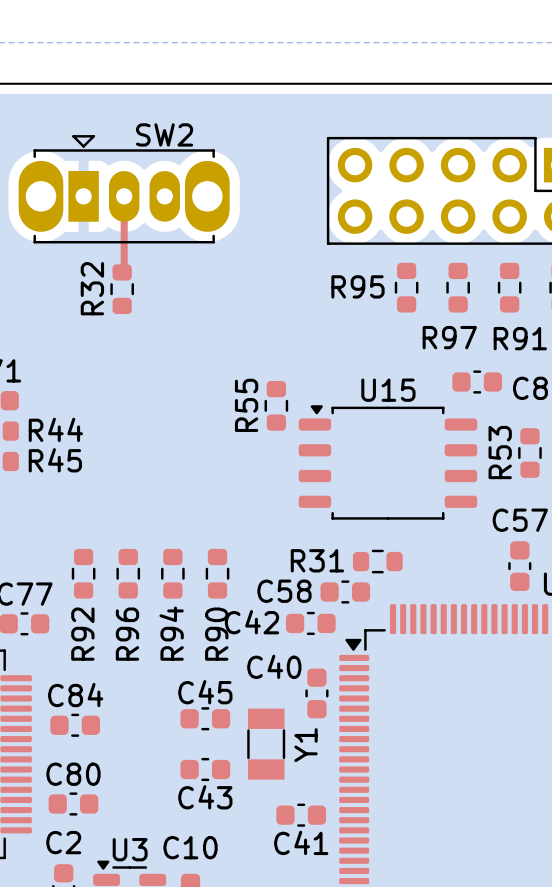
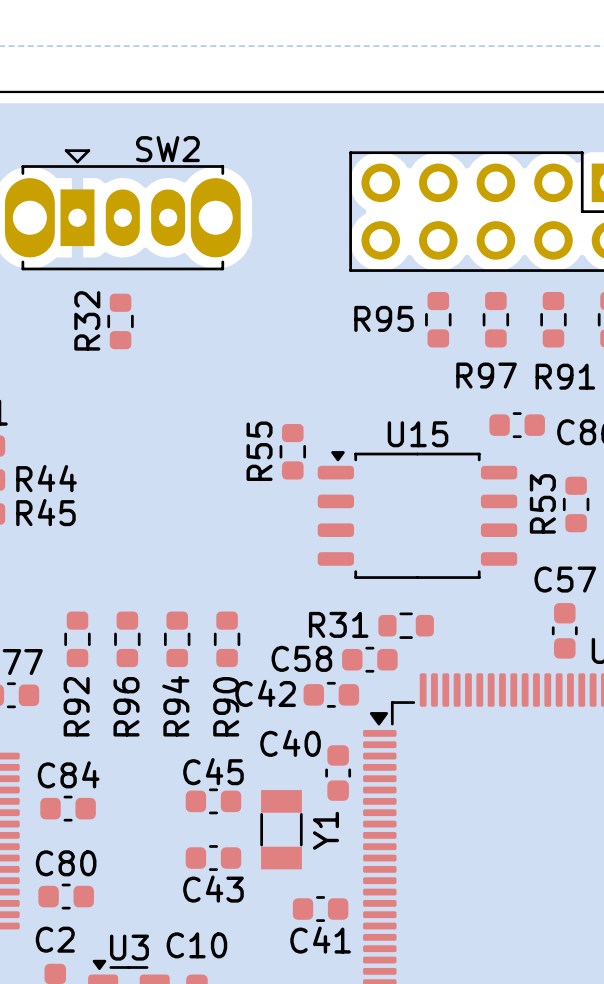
top track: (124, 196) (124, 270) (122, 272) -> none

